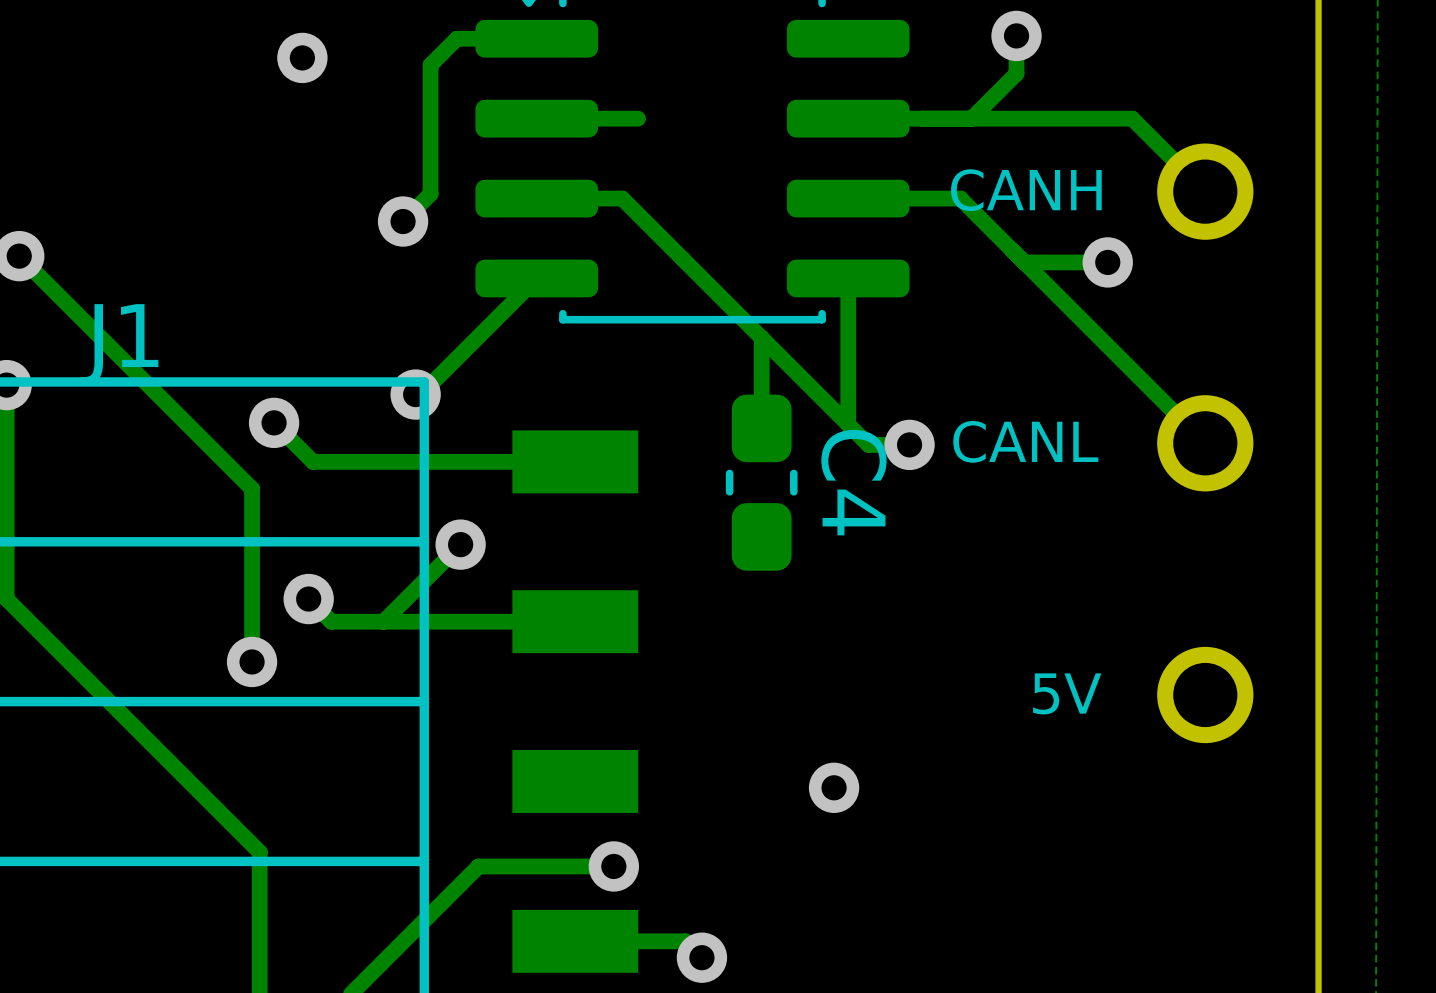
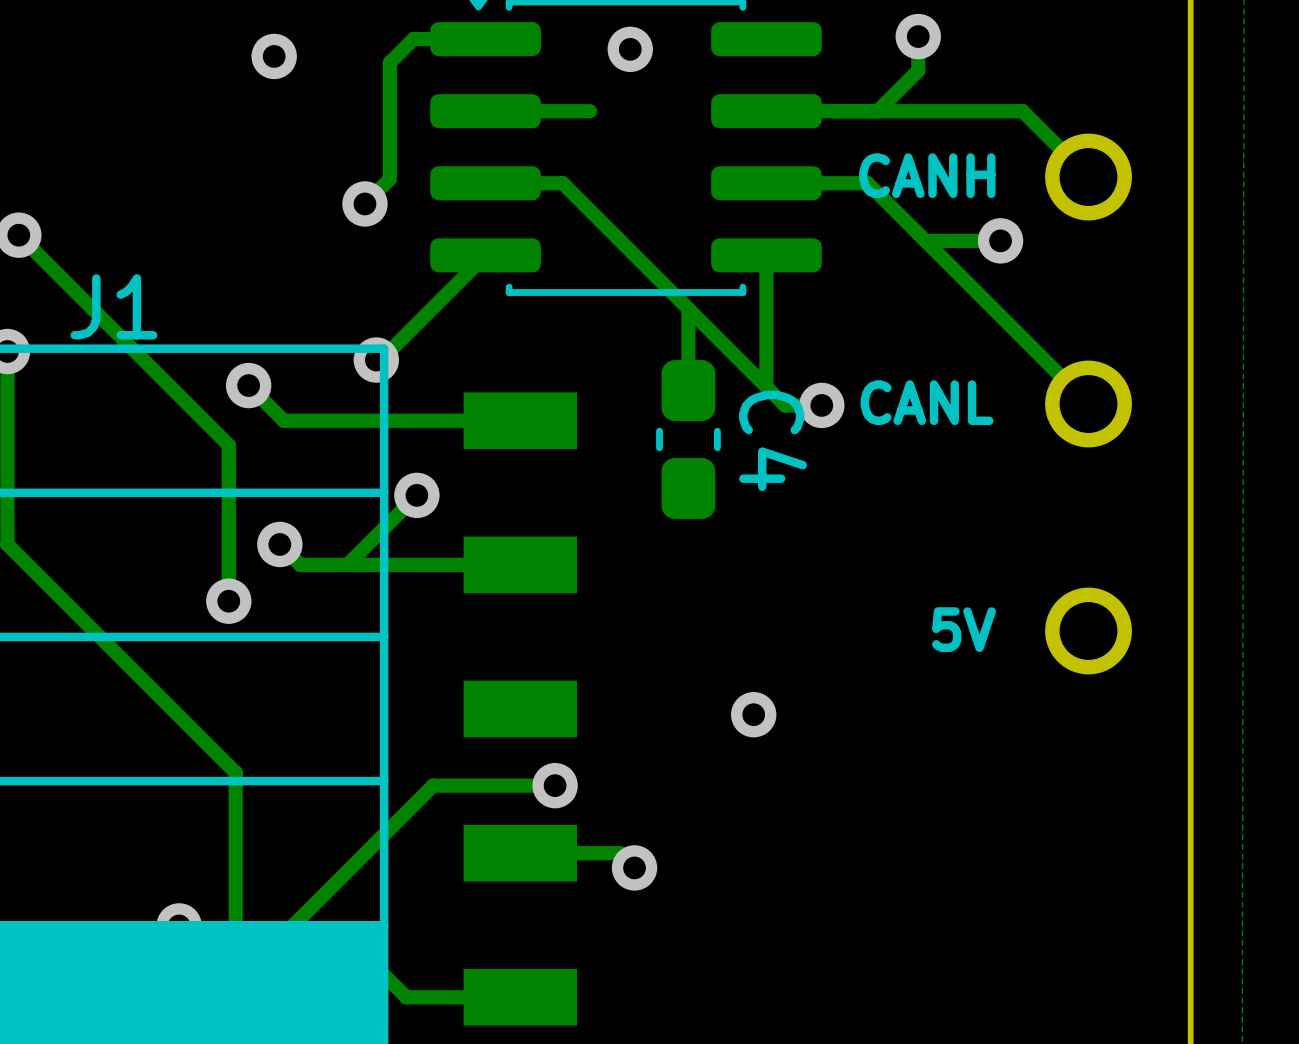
via: none -> (630, 49)
track: none -> (589, 111) (576, 111)

